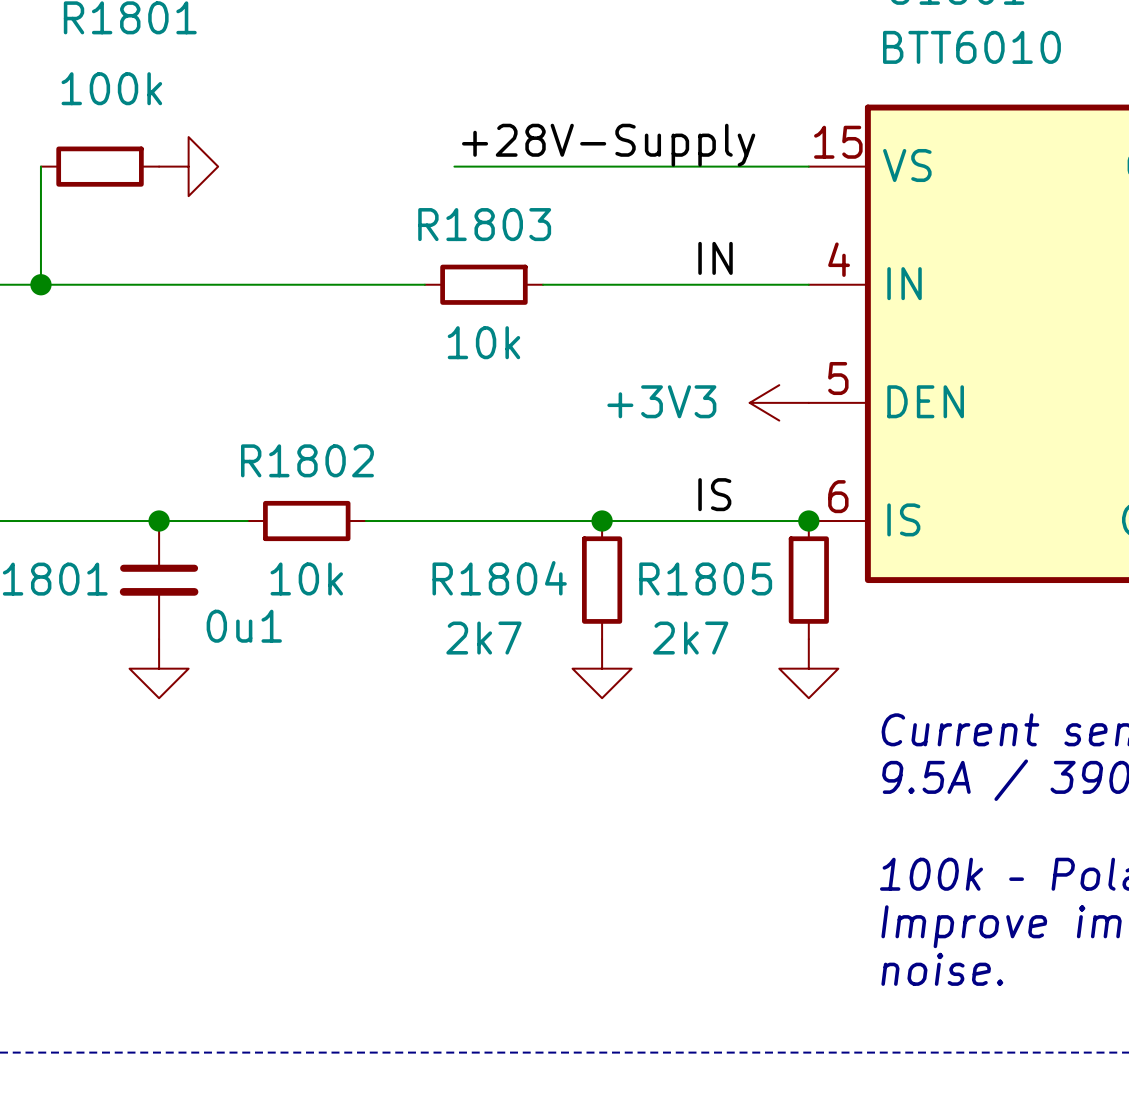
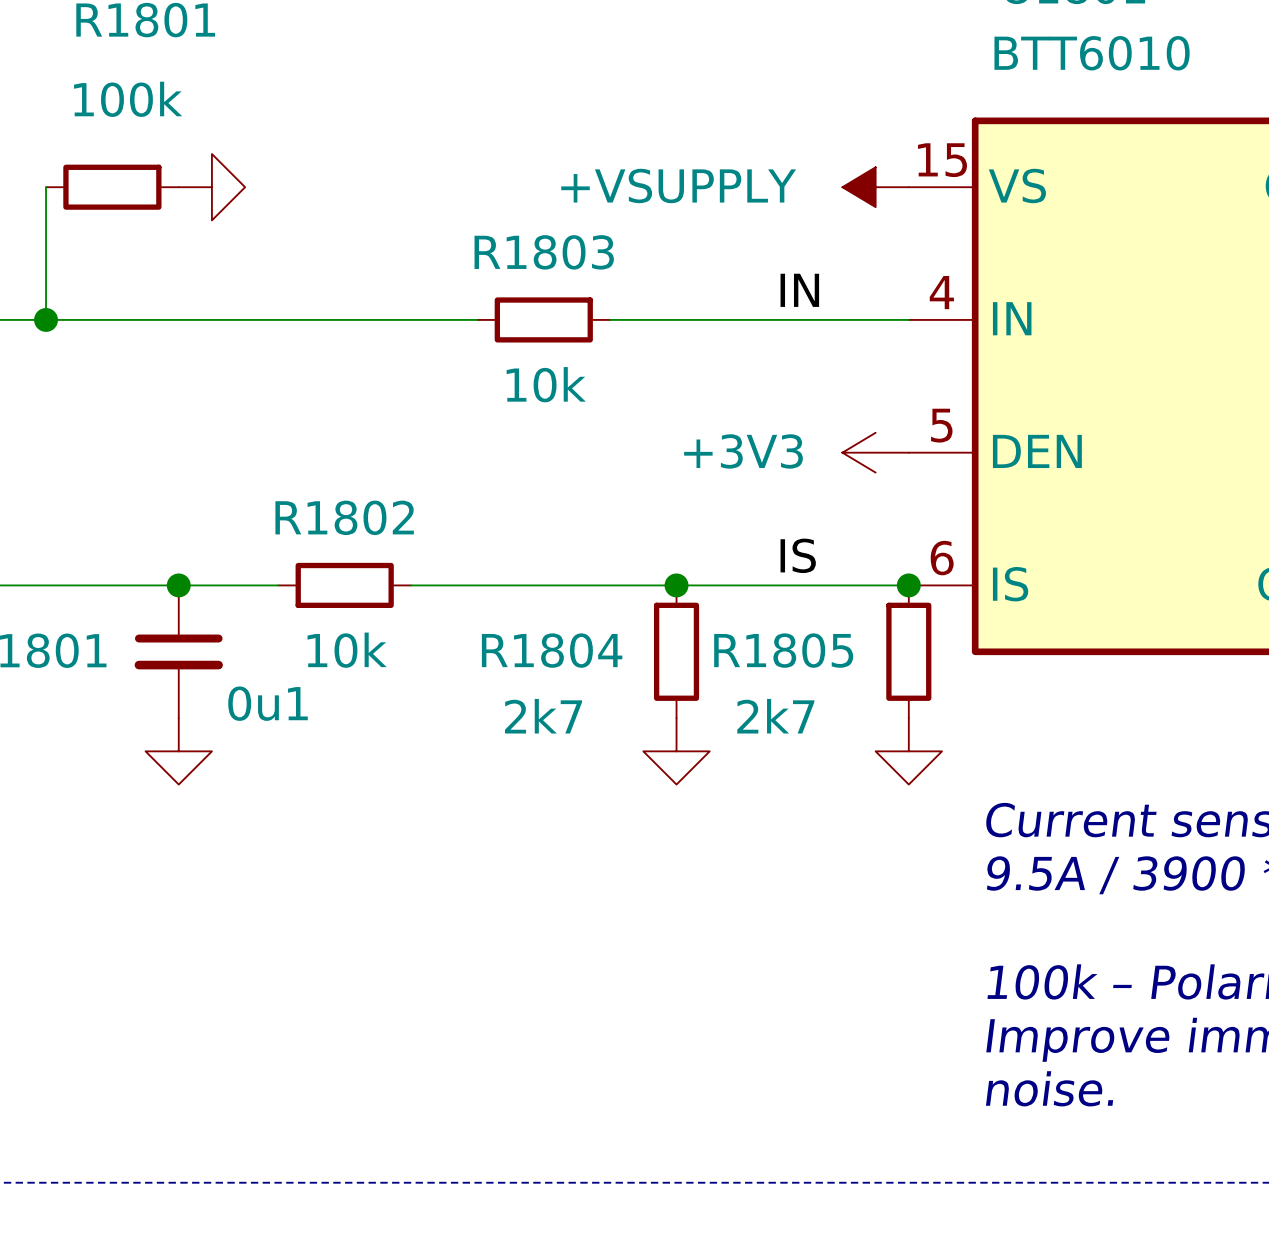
label: +28V-Supply (608, 145) -> none
wire: (454, 166) (808, 166) -> none
power symbol: none -> +VSUPPLY (875, 187)

